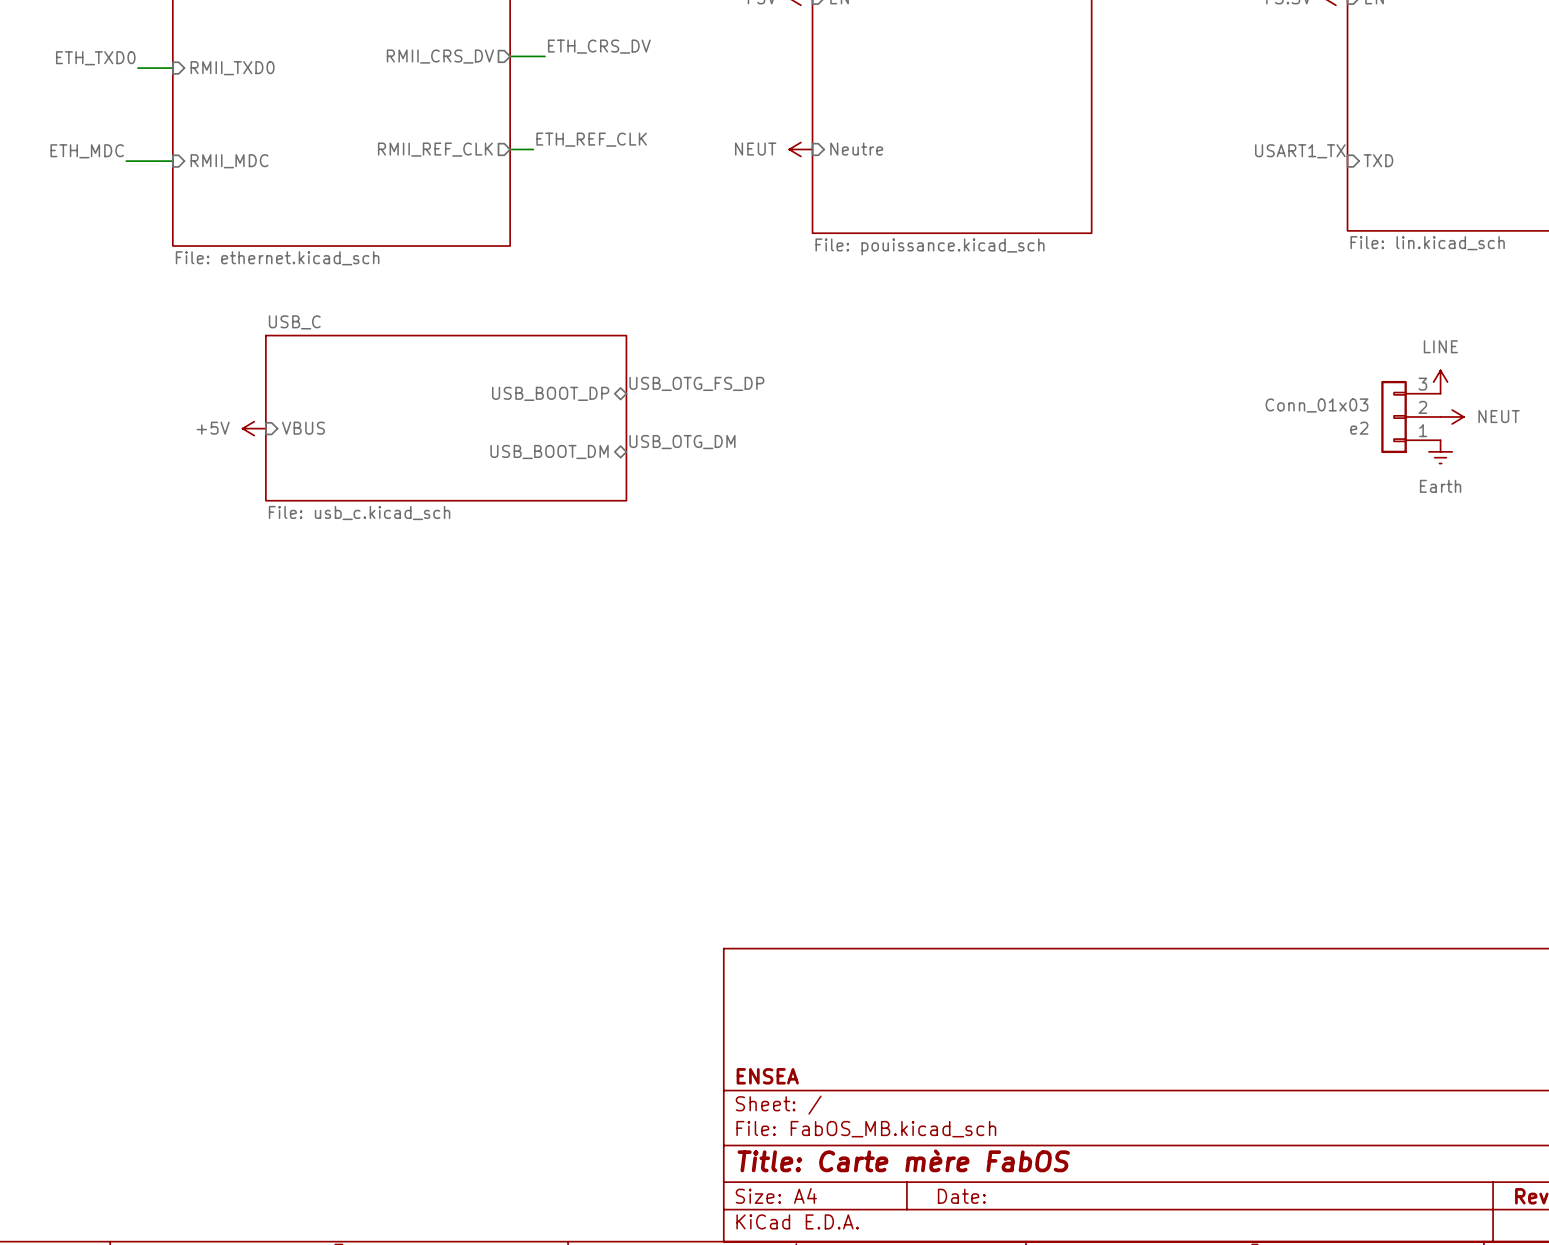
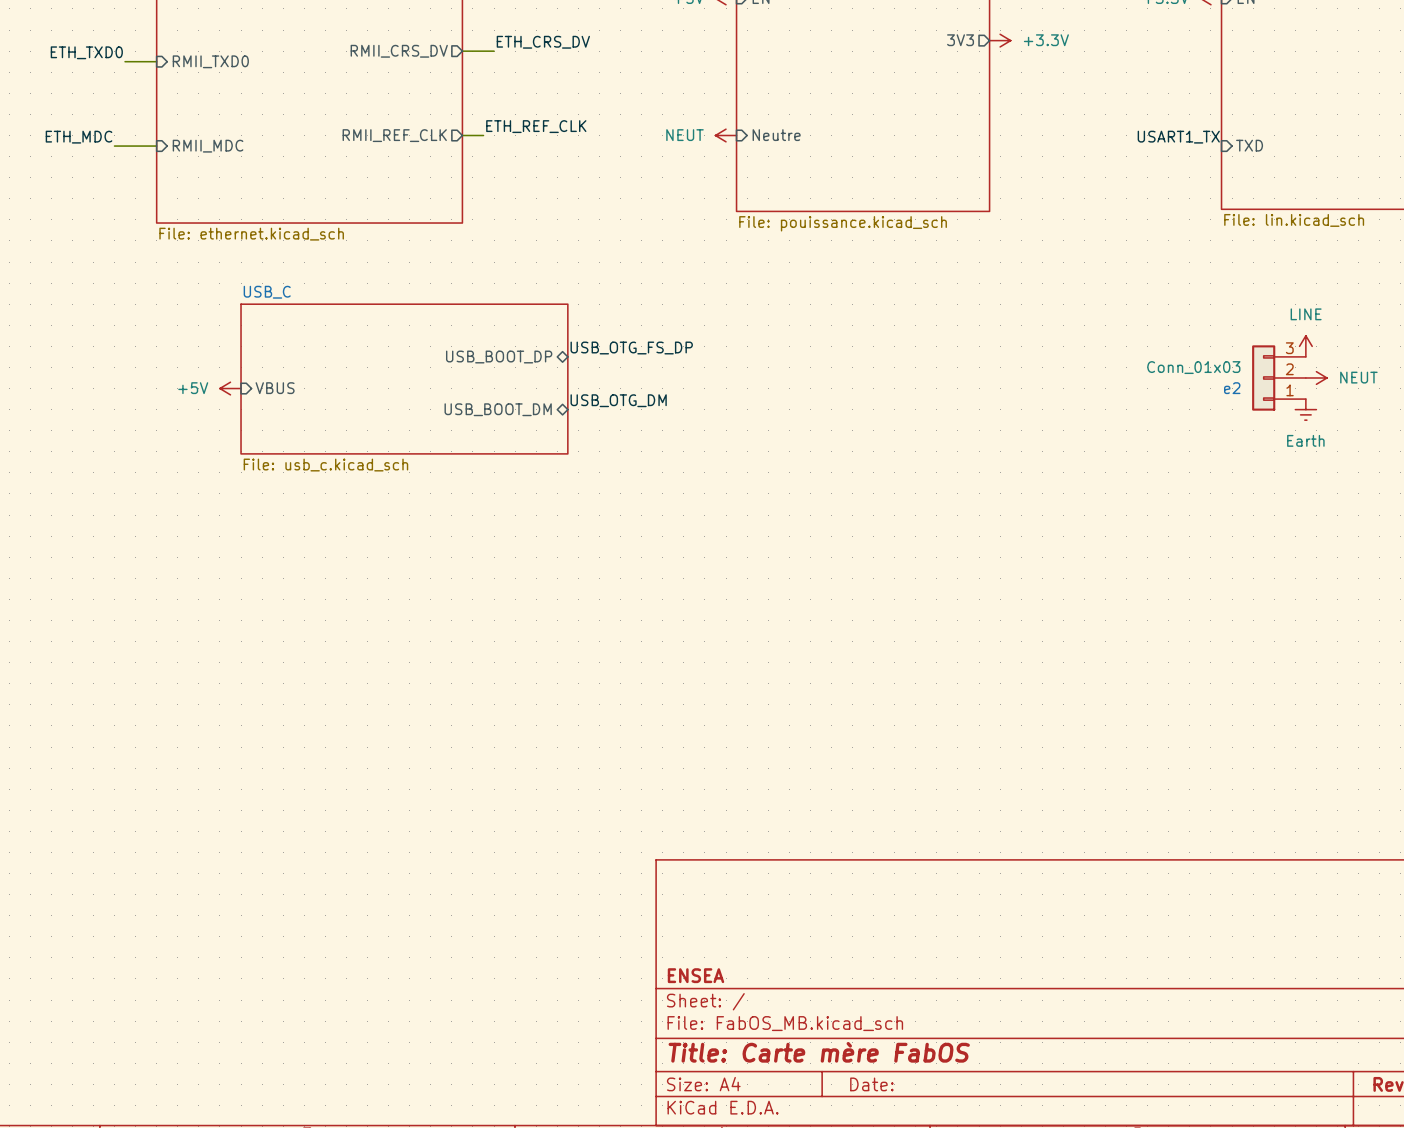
sheet pin: none -> 3V3 (960, 40)
power symbol: none -> +3.3V (1000, 40)

